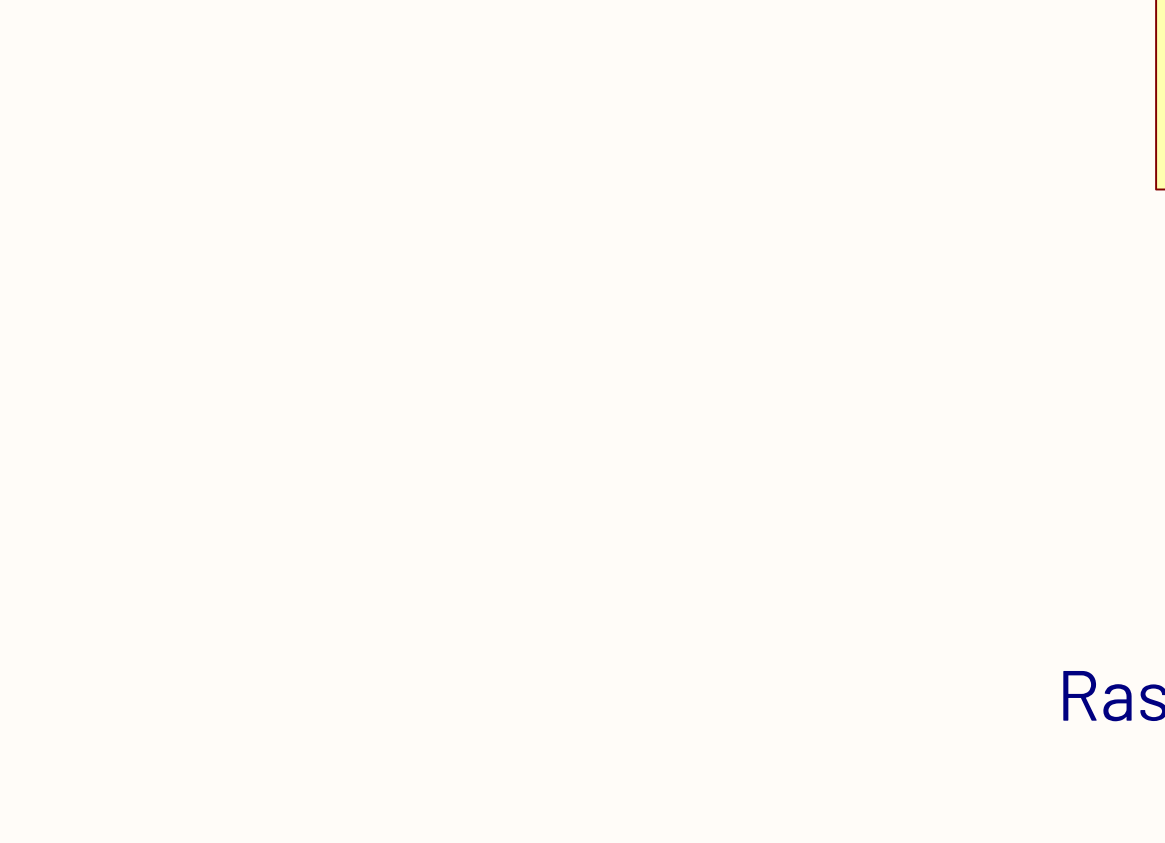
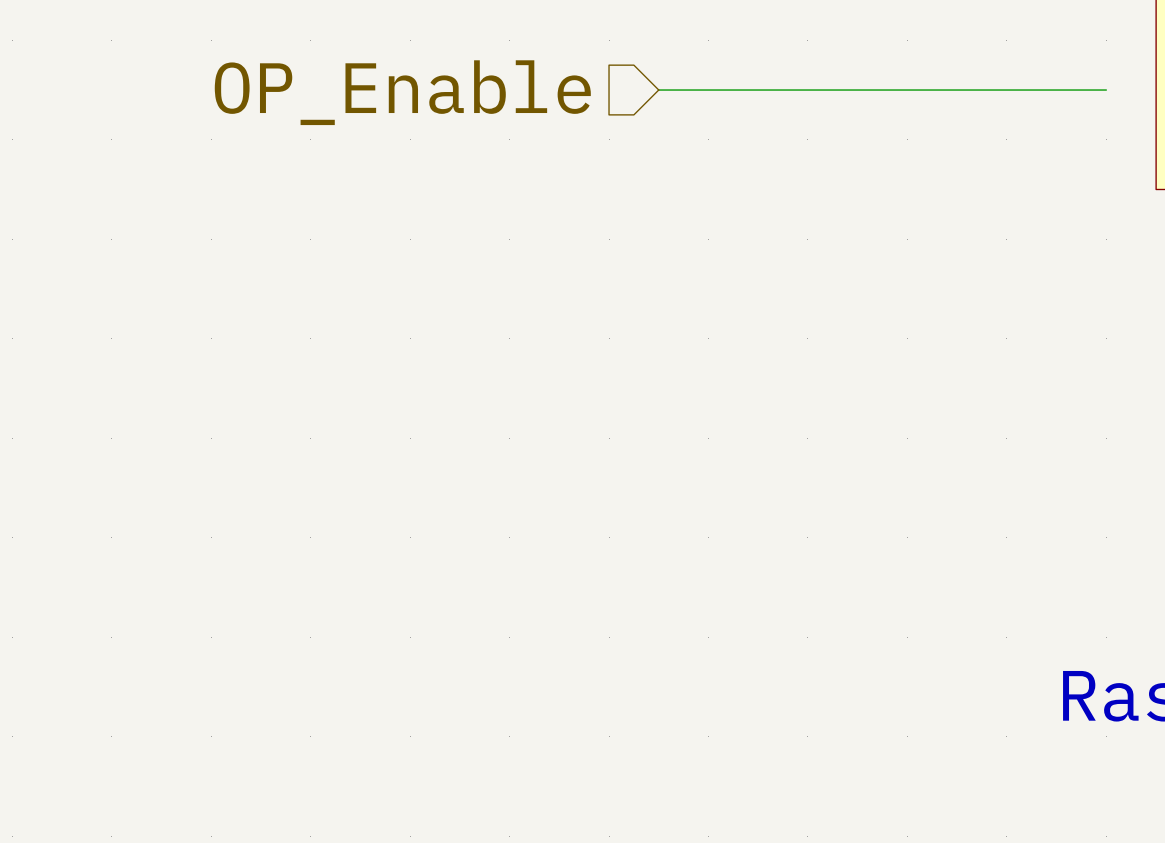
hierarchical label: none -> OP_Enable (402, 92)
wire: none -> (658, 90) (1106, 90)

